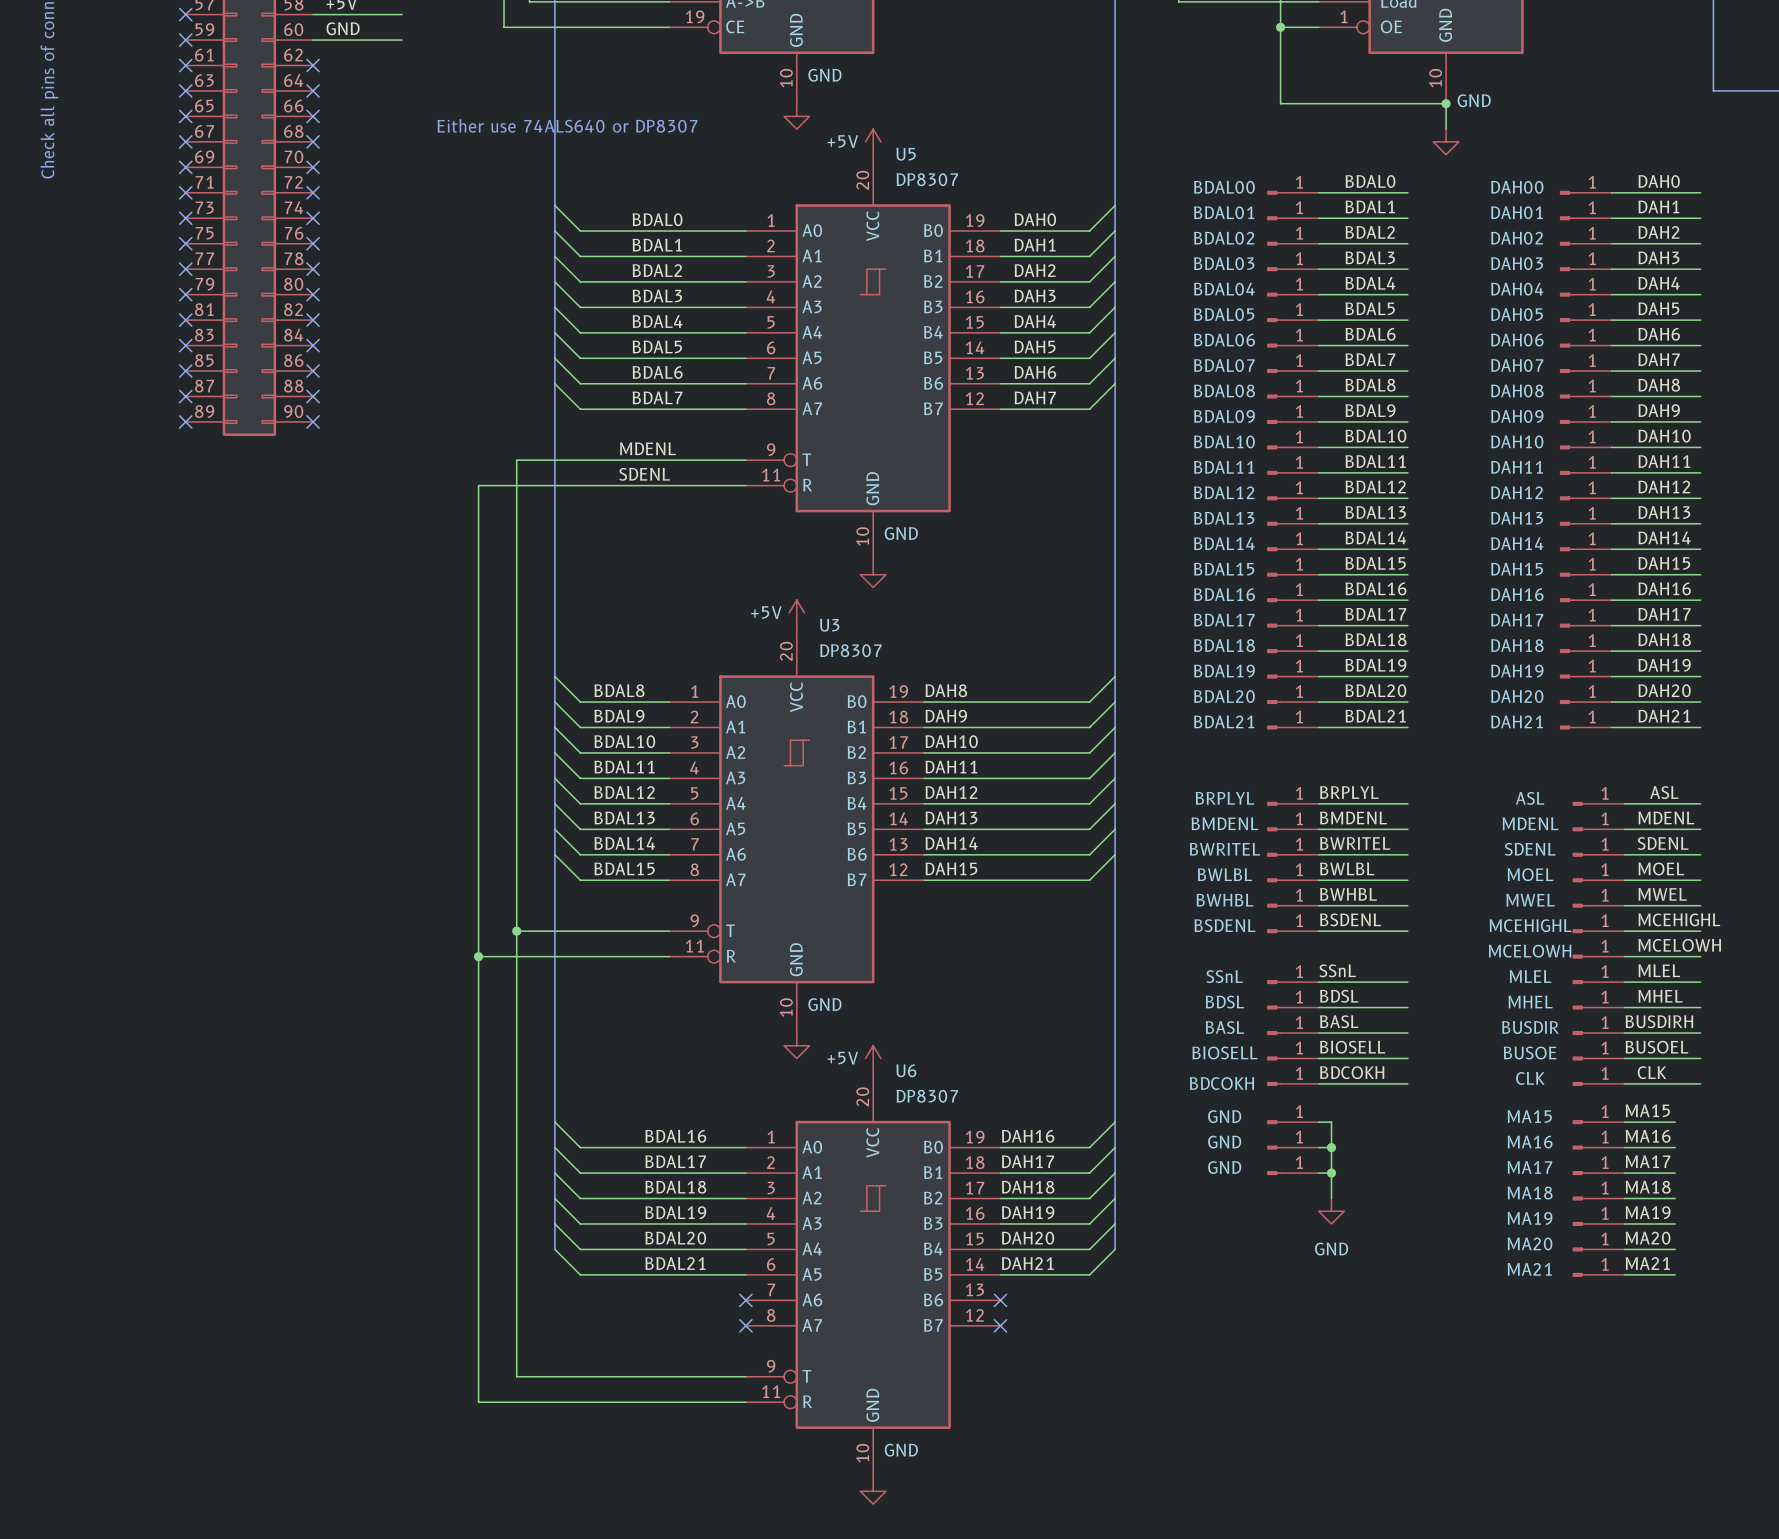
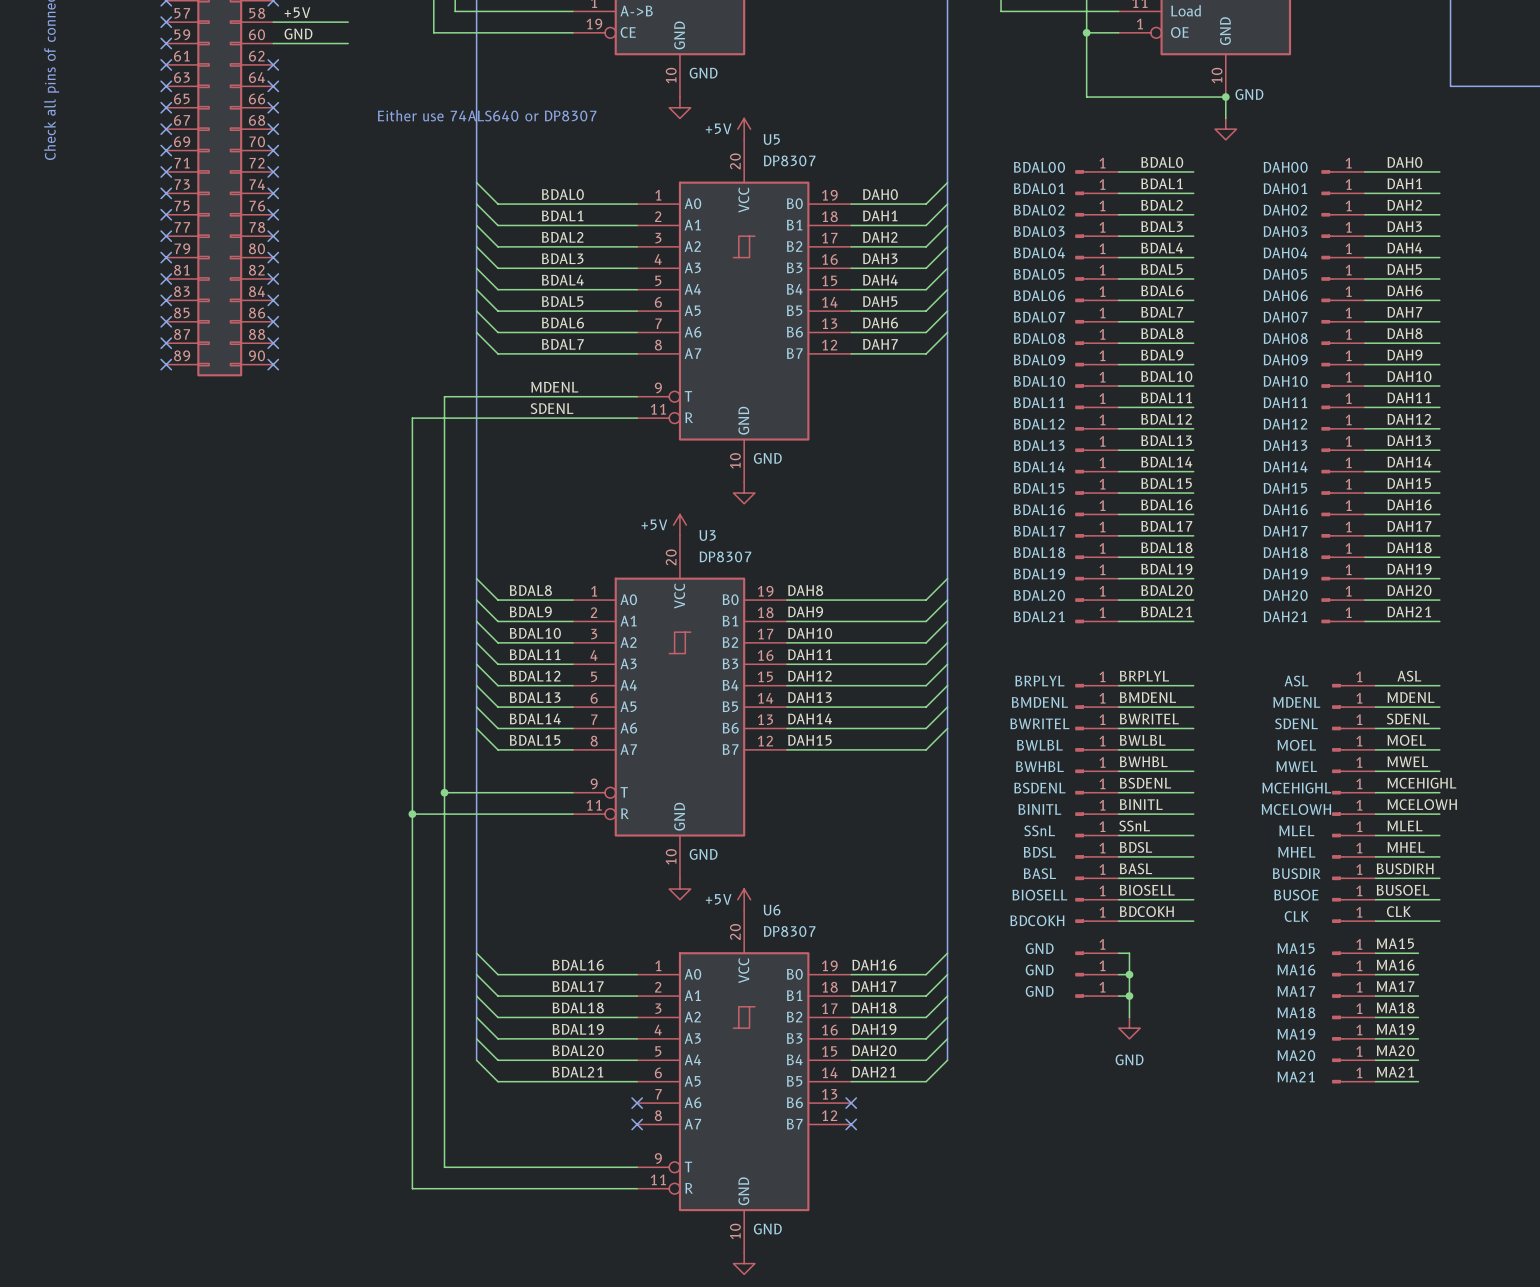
label: none -> BINITL (1141, 804)
part: none -> BINITL (1097, 814)
wire: none -> (1118, 814) (1193, 814)

